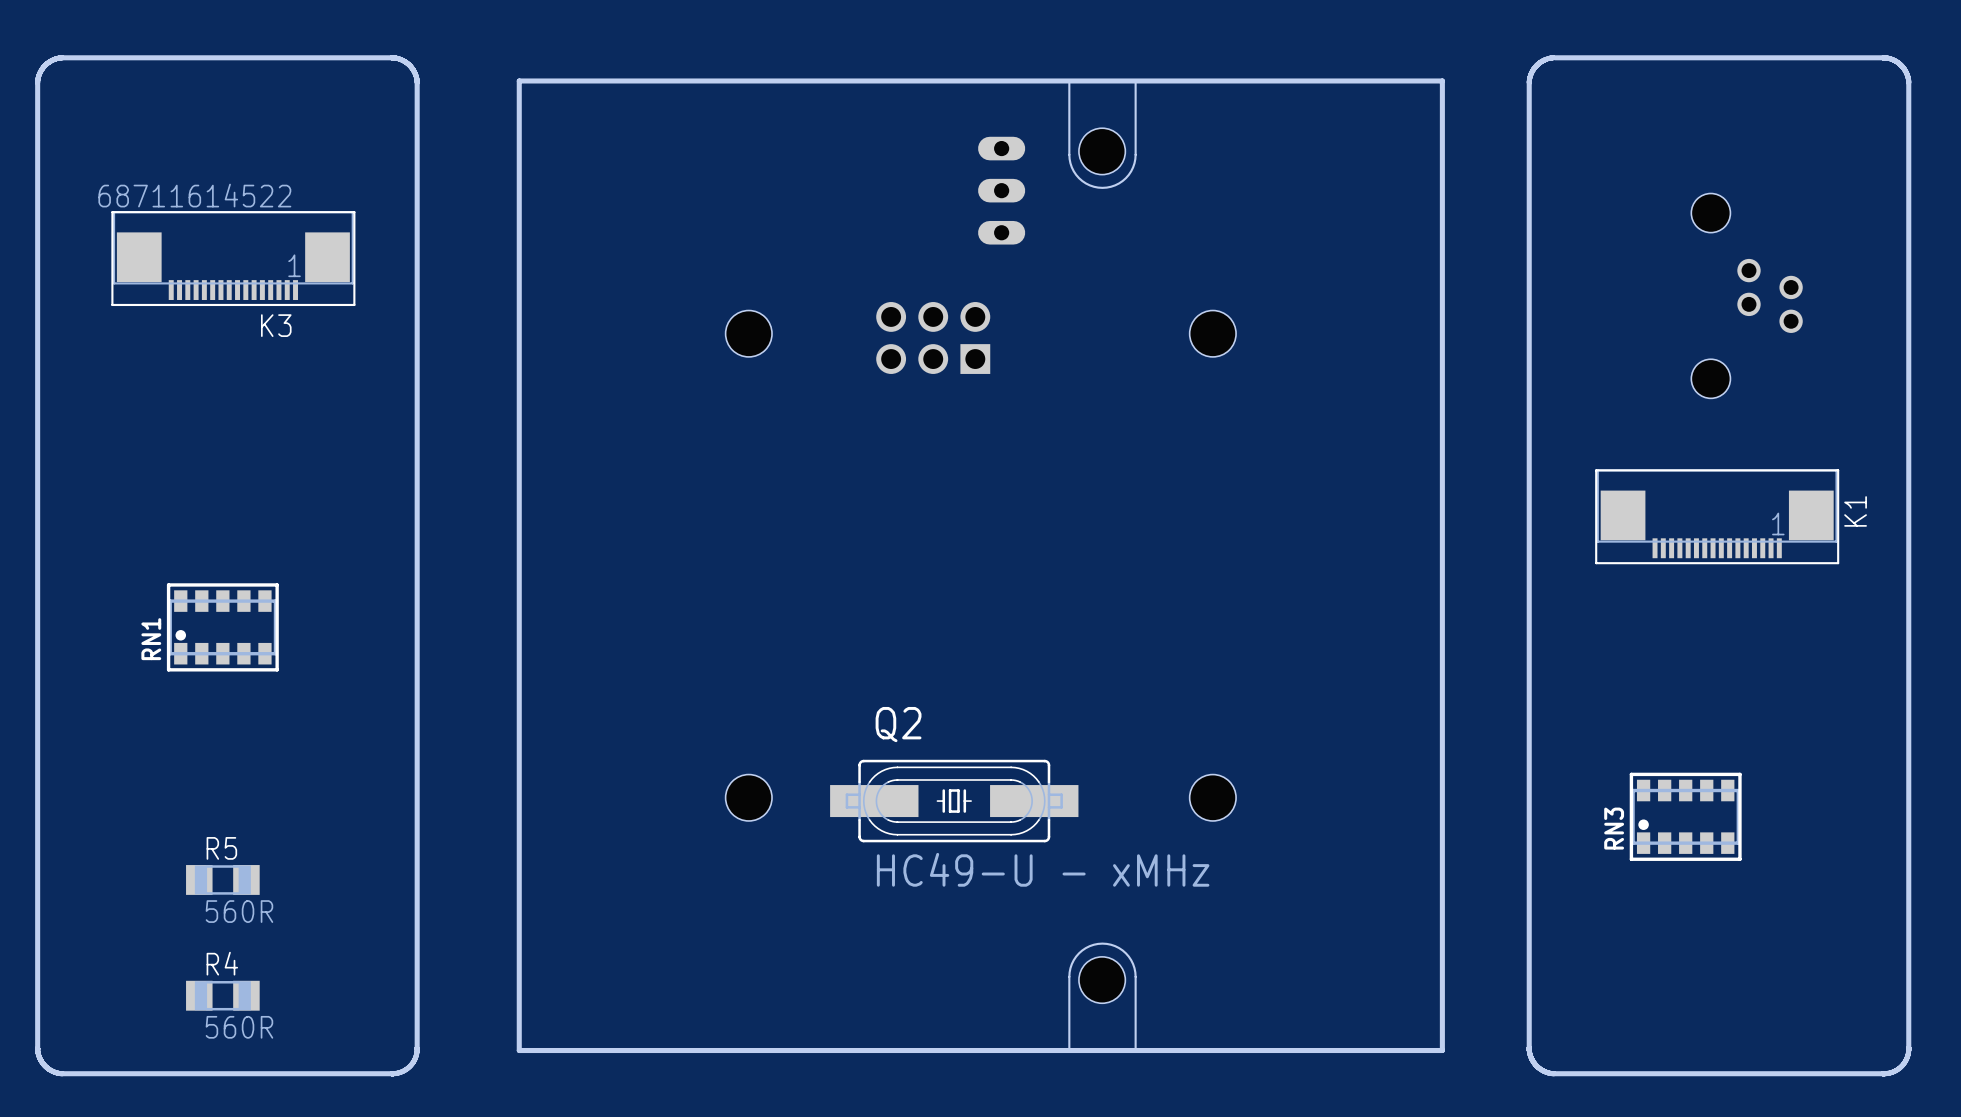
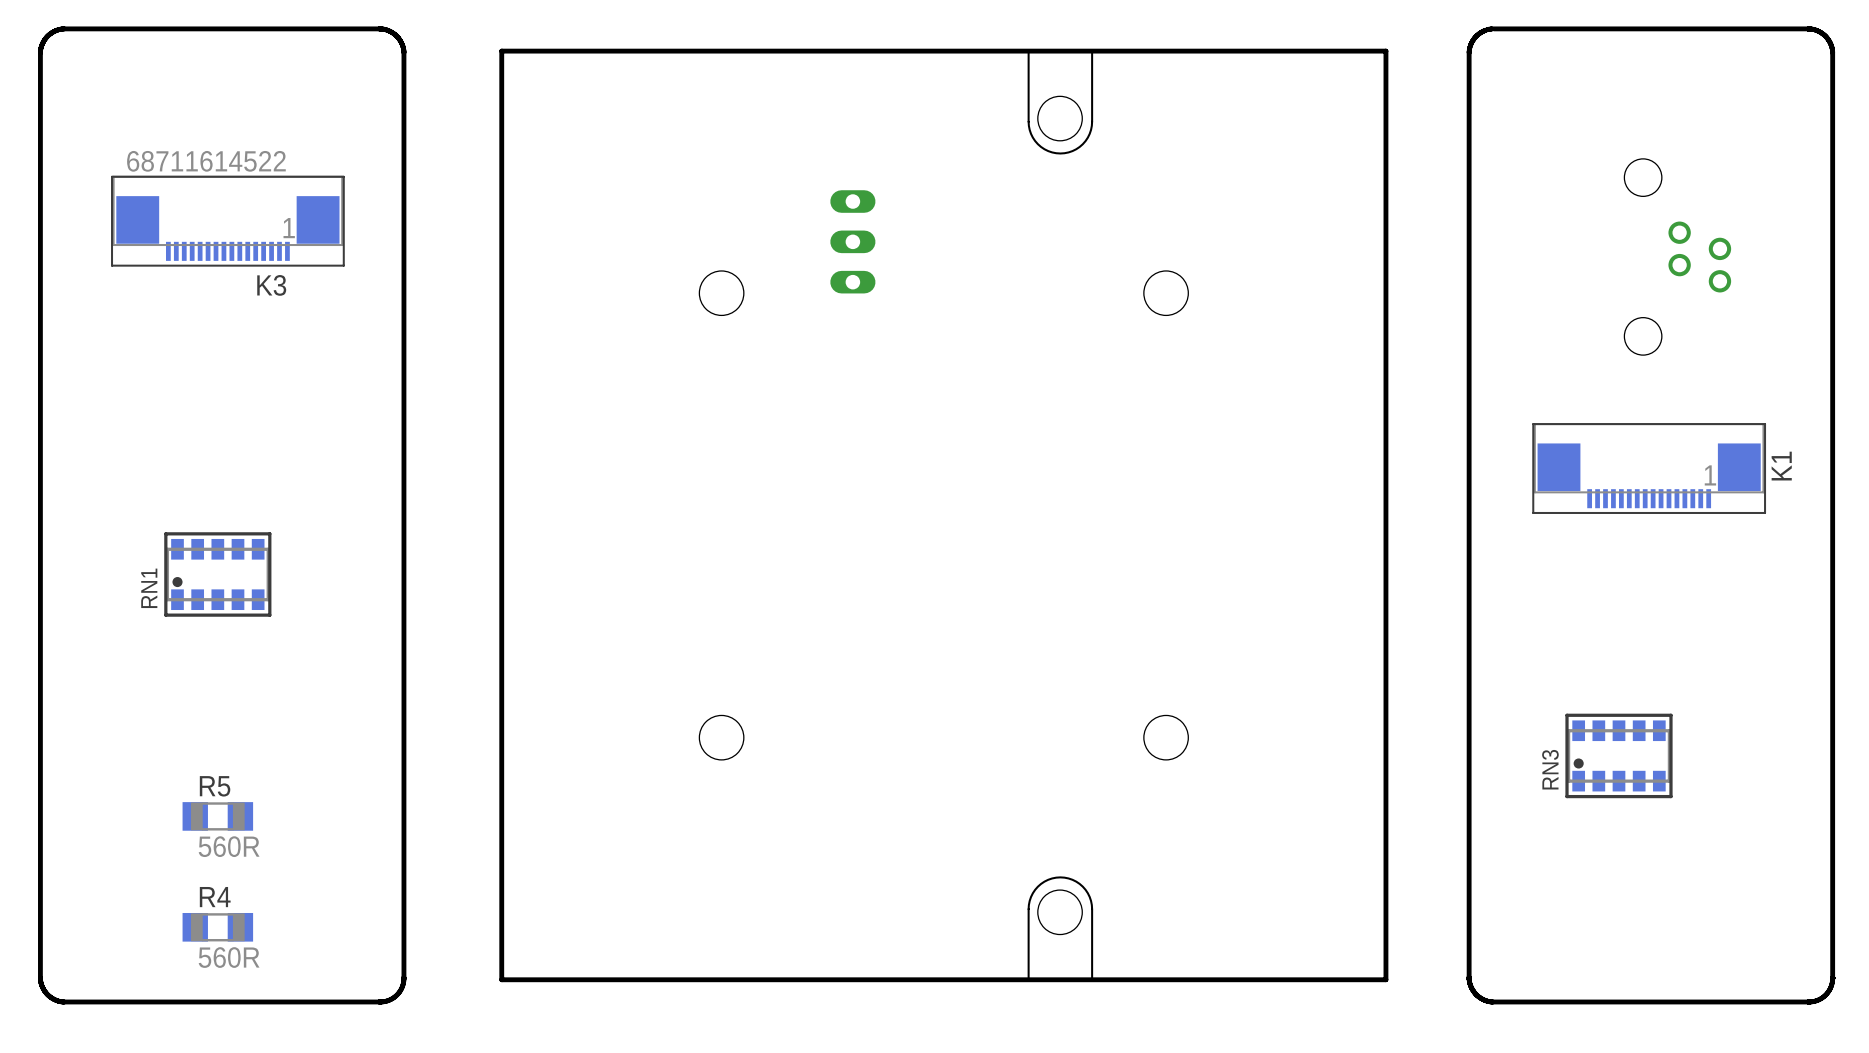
part position: (1001, 190) -> (852, 241)
part: (933, 337) -> none
Q2: HC49-U - xMHz (954, 801) -> none

